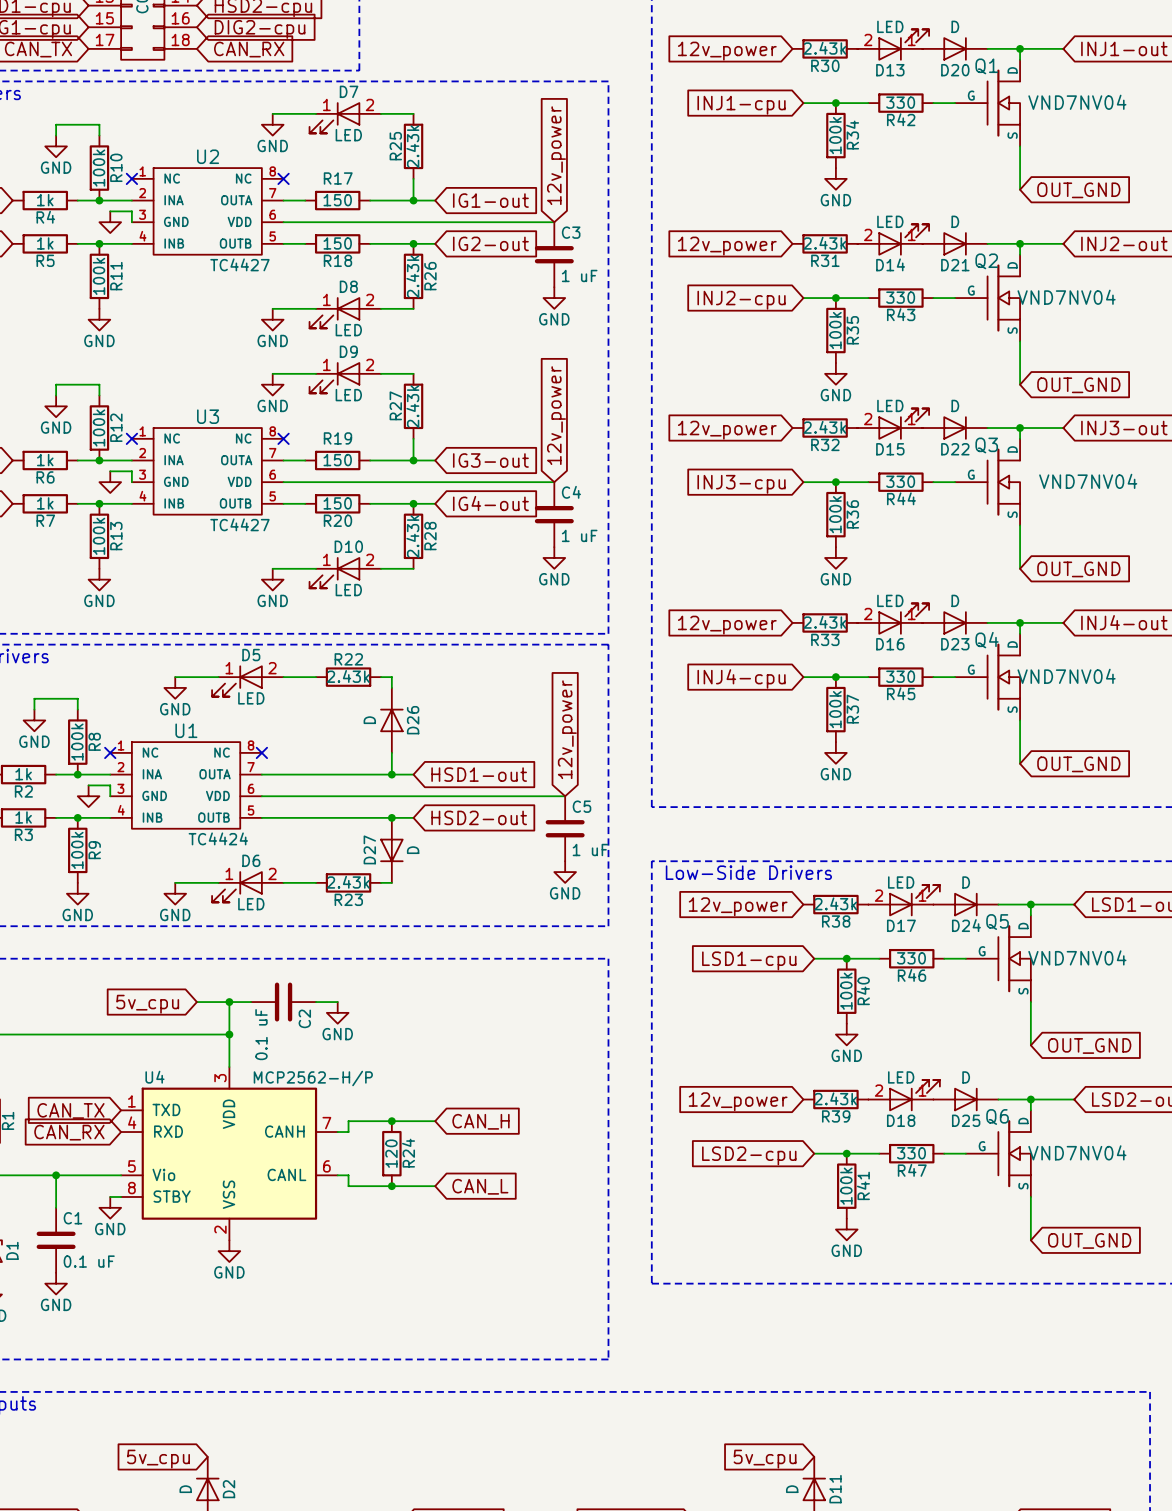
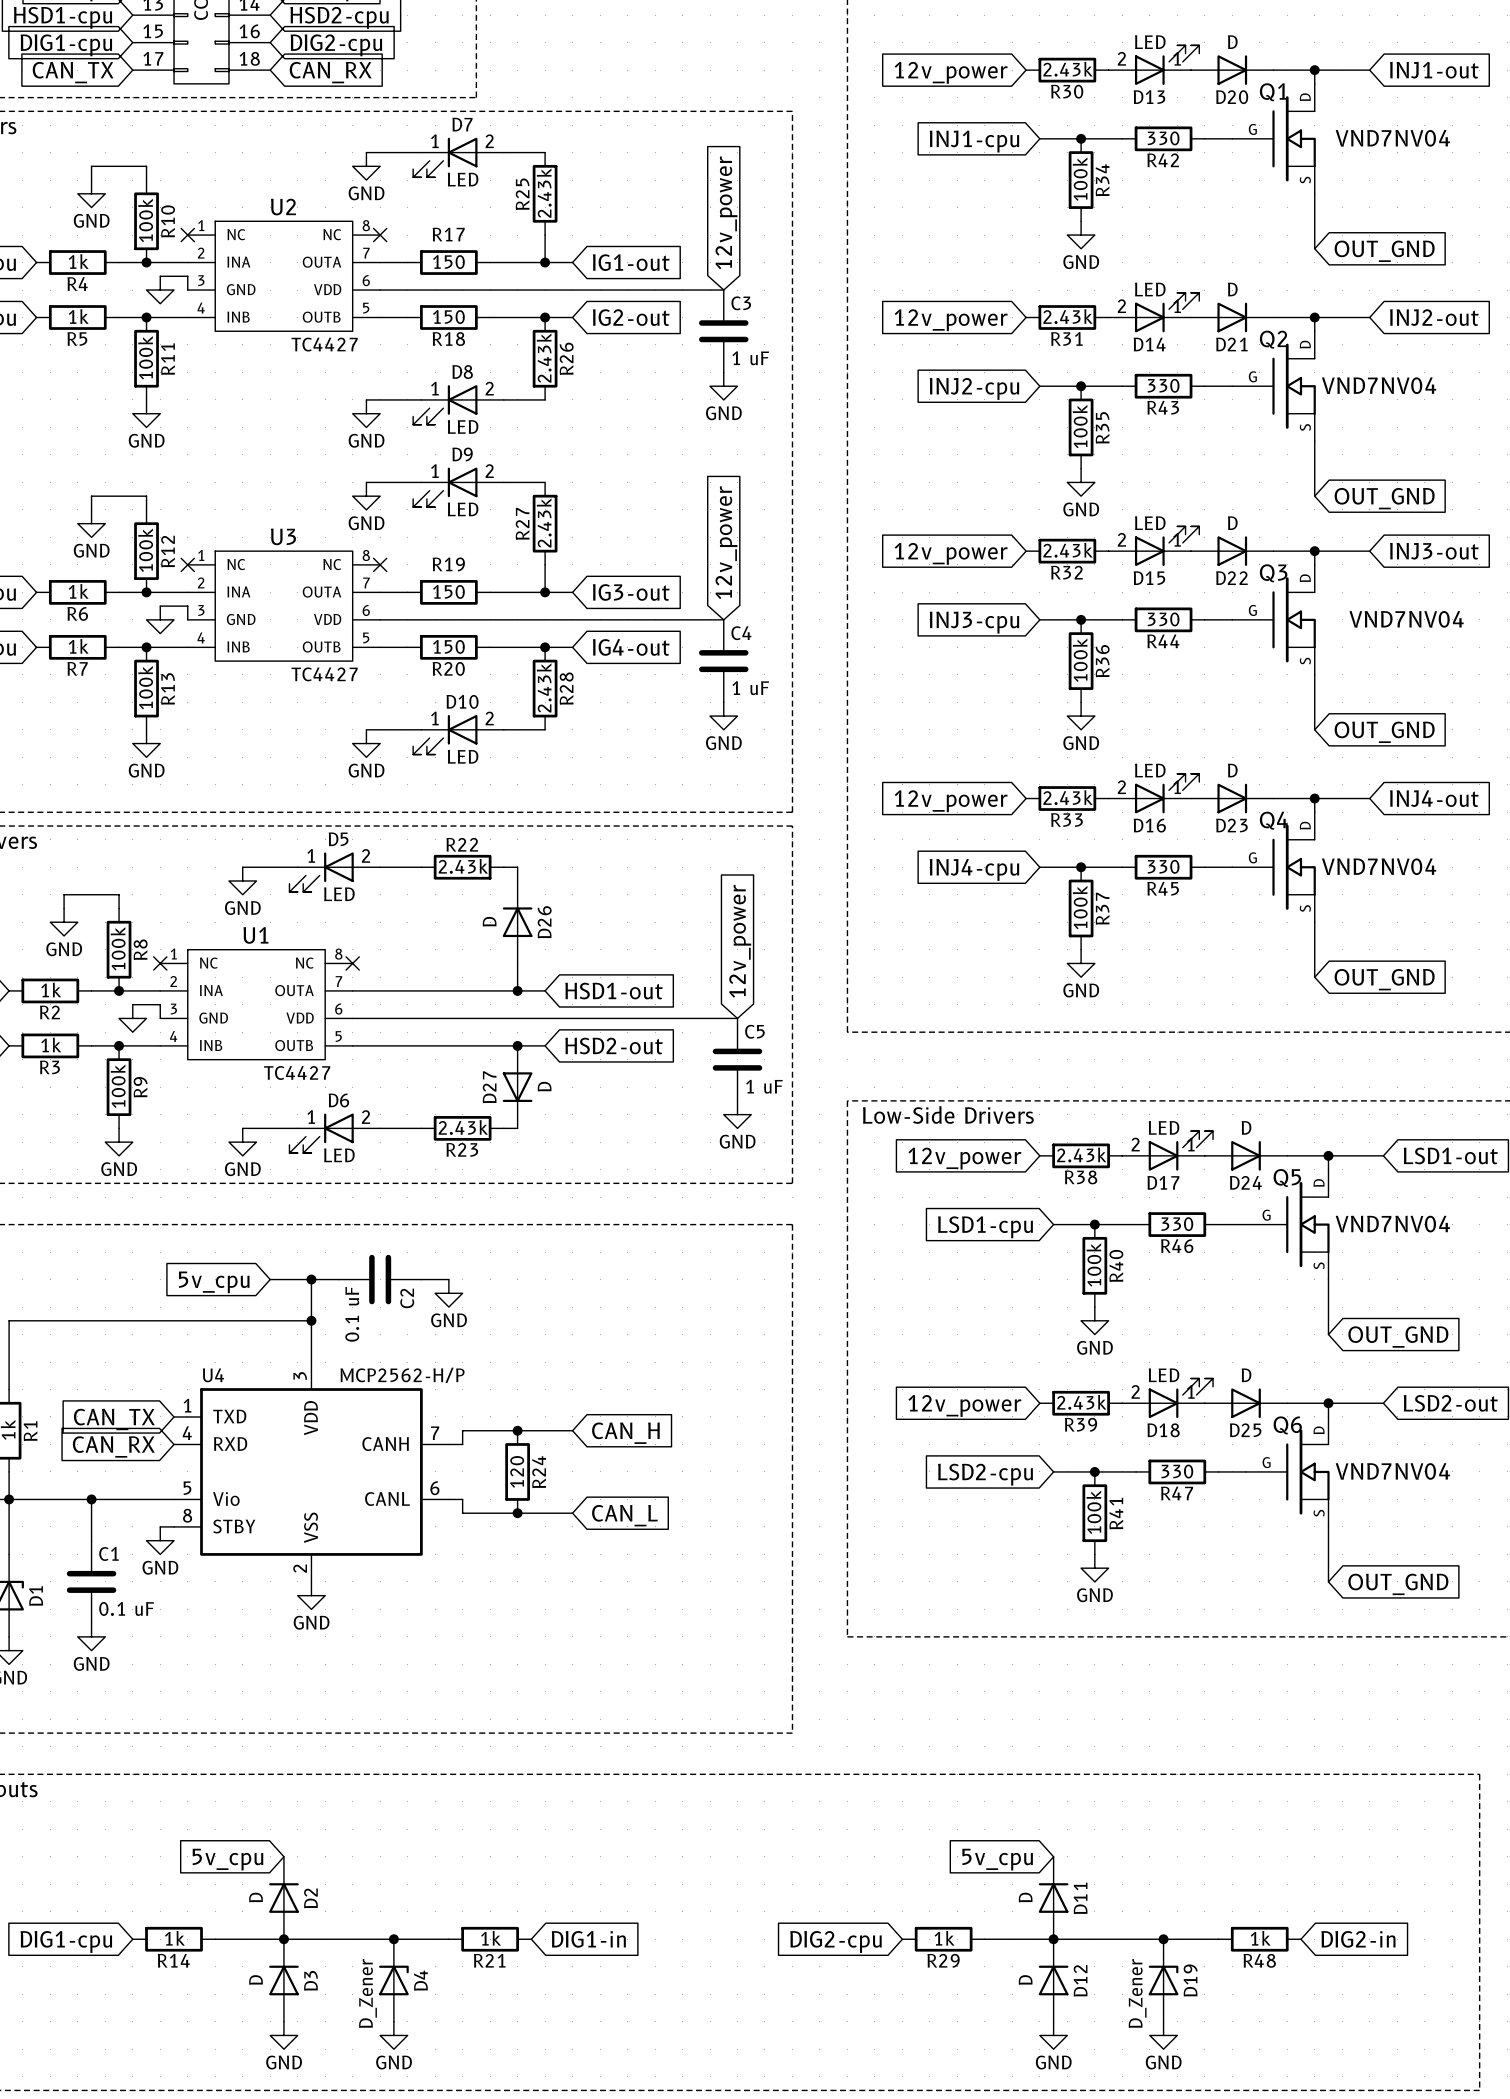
U1 value: TC4424 (218, 838) -> TC4427 (297, 1072)

